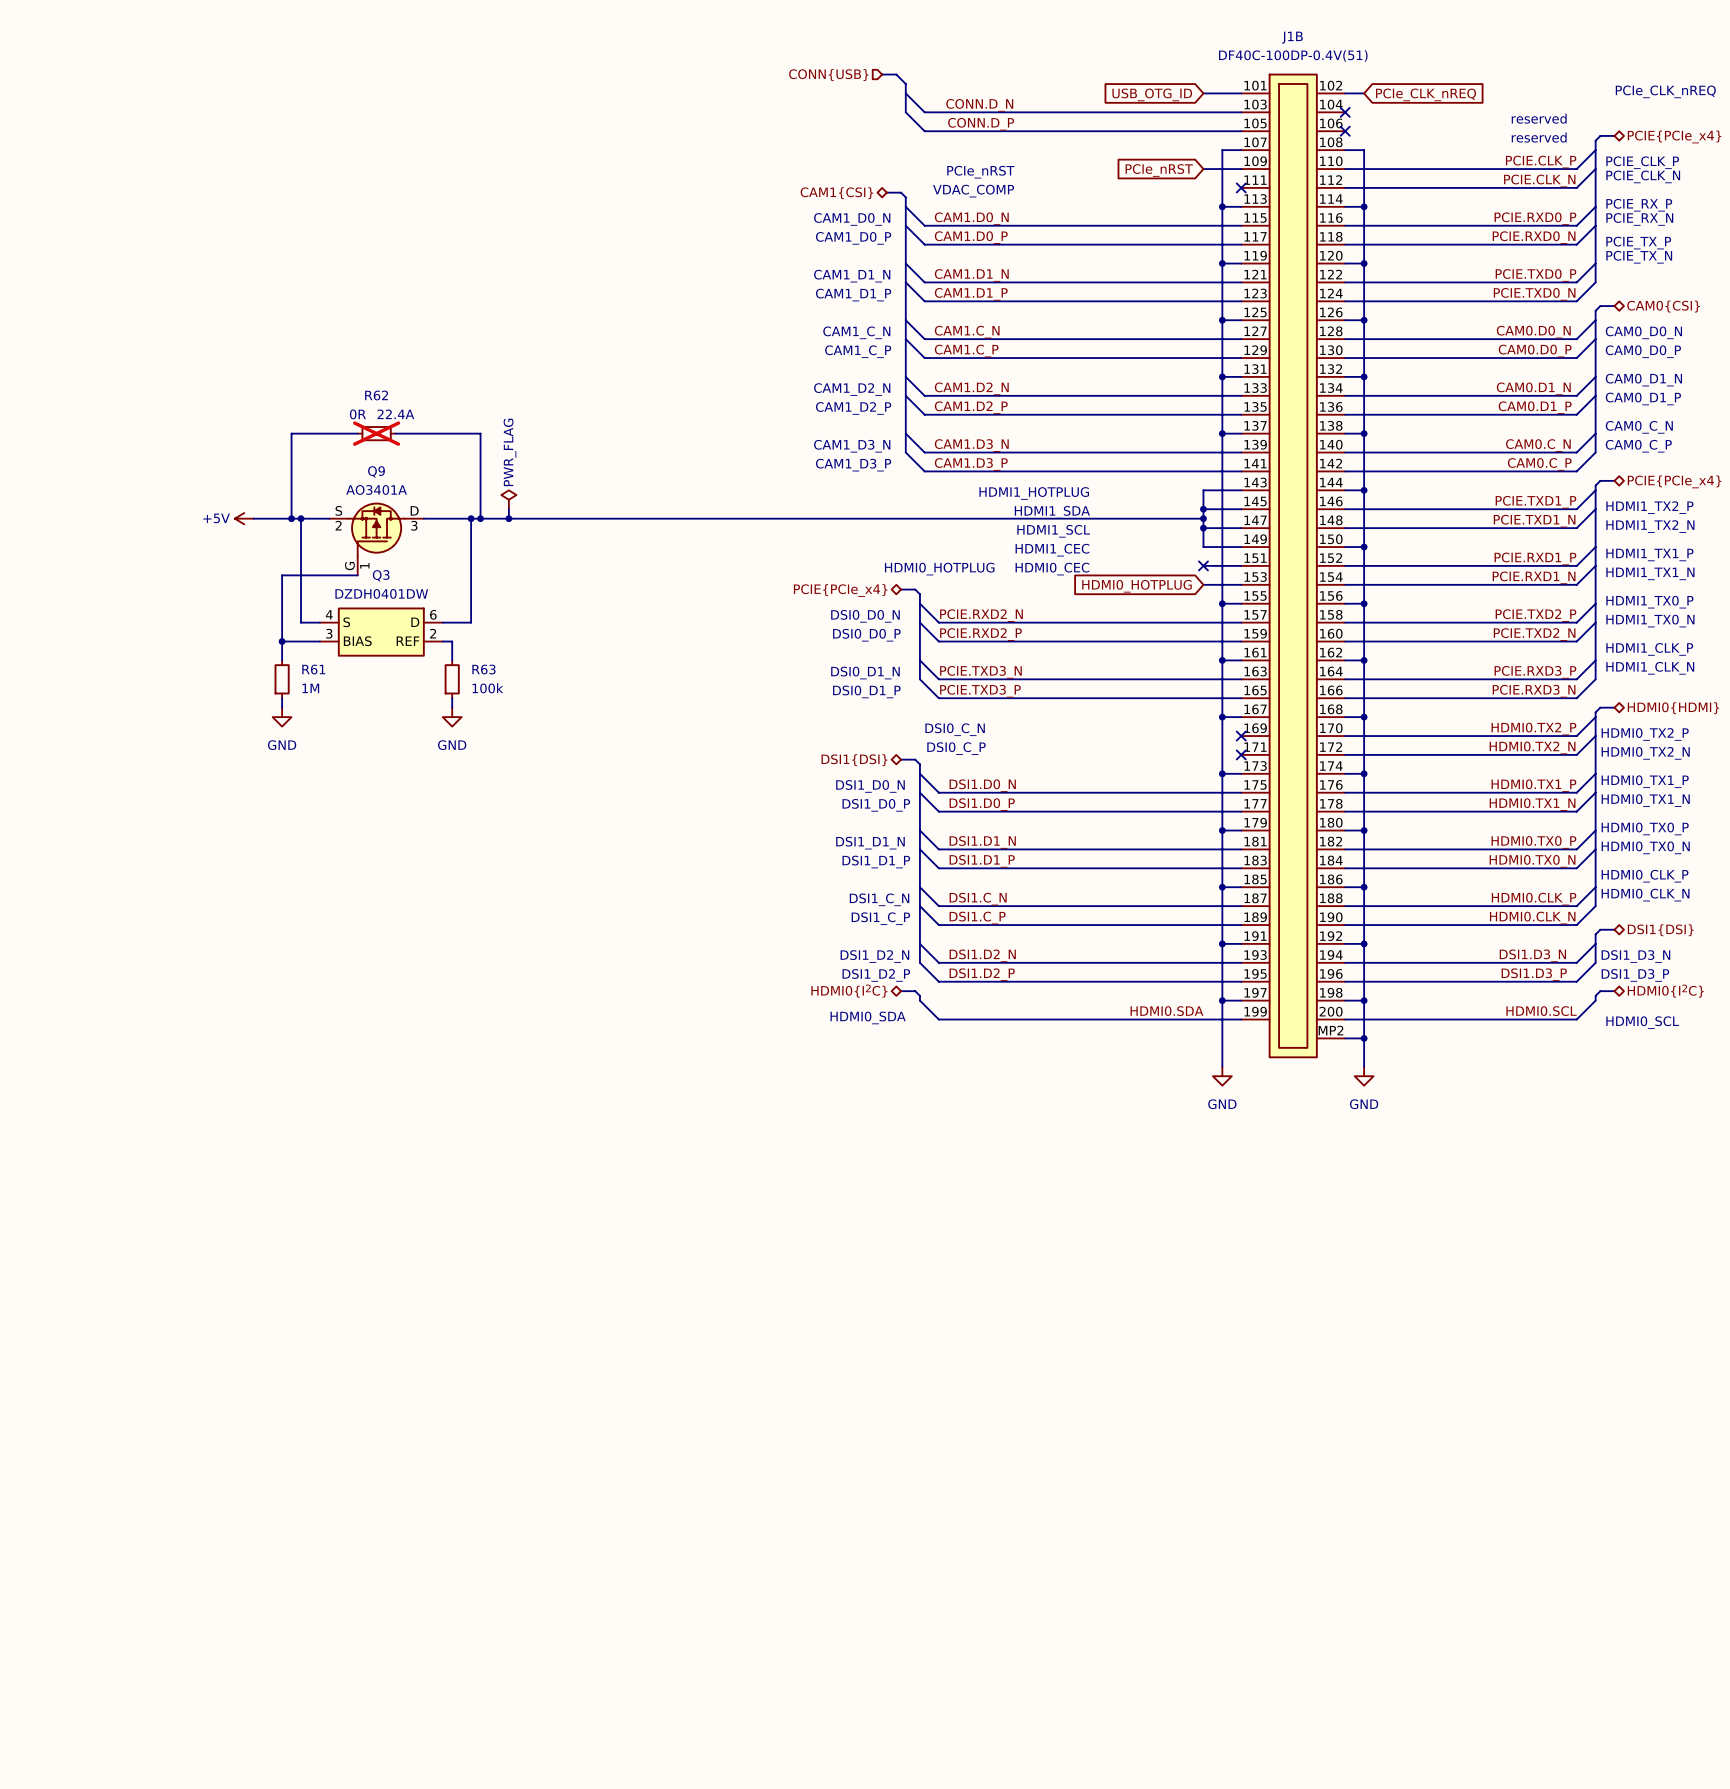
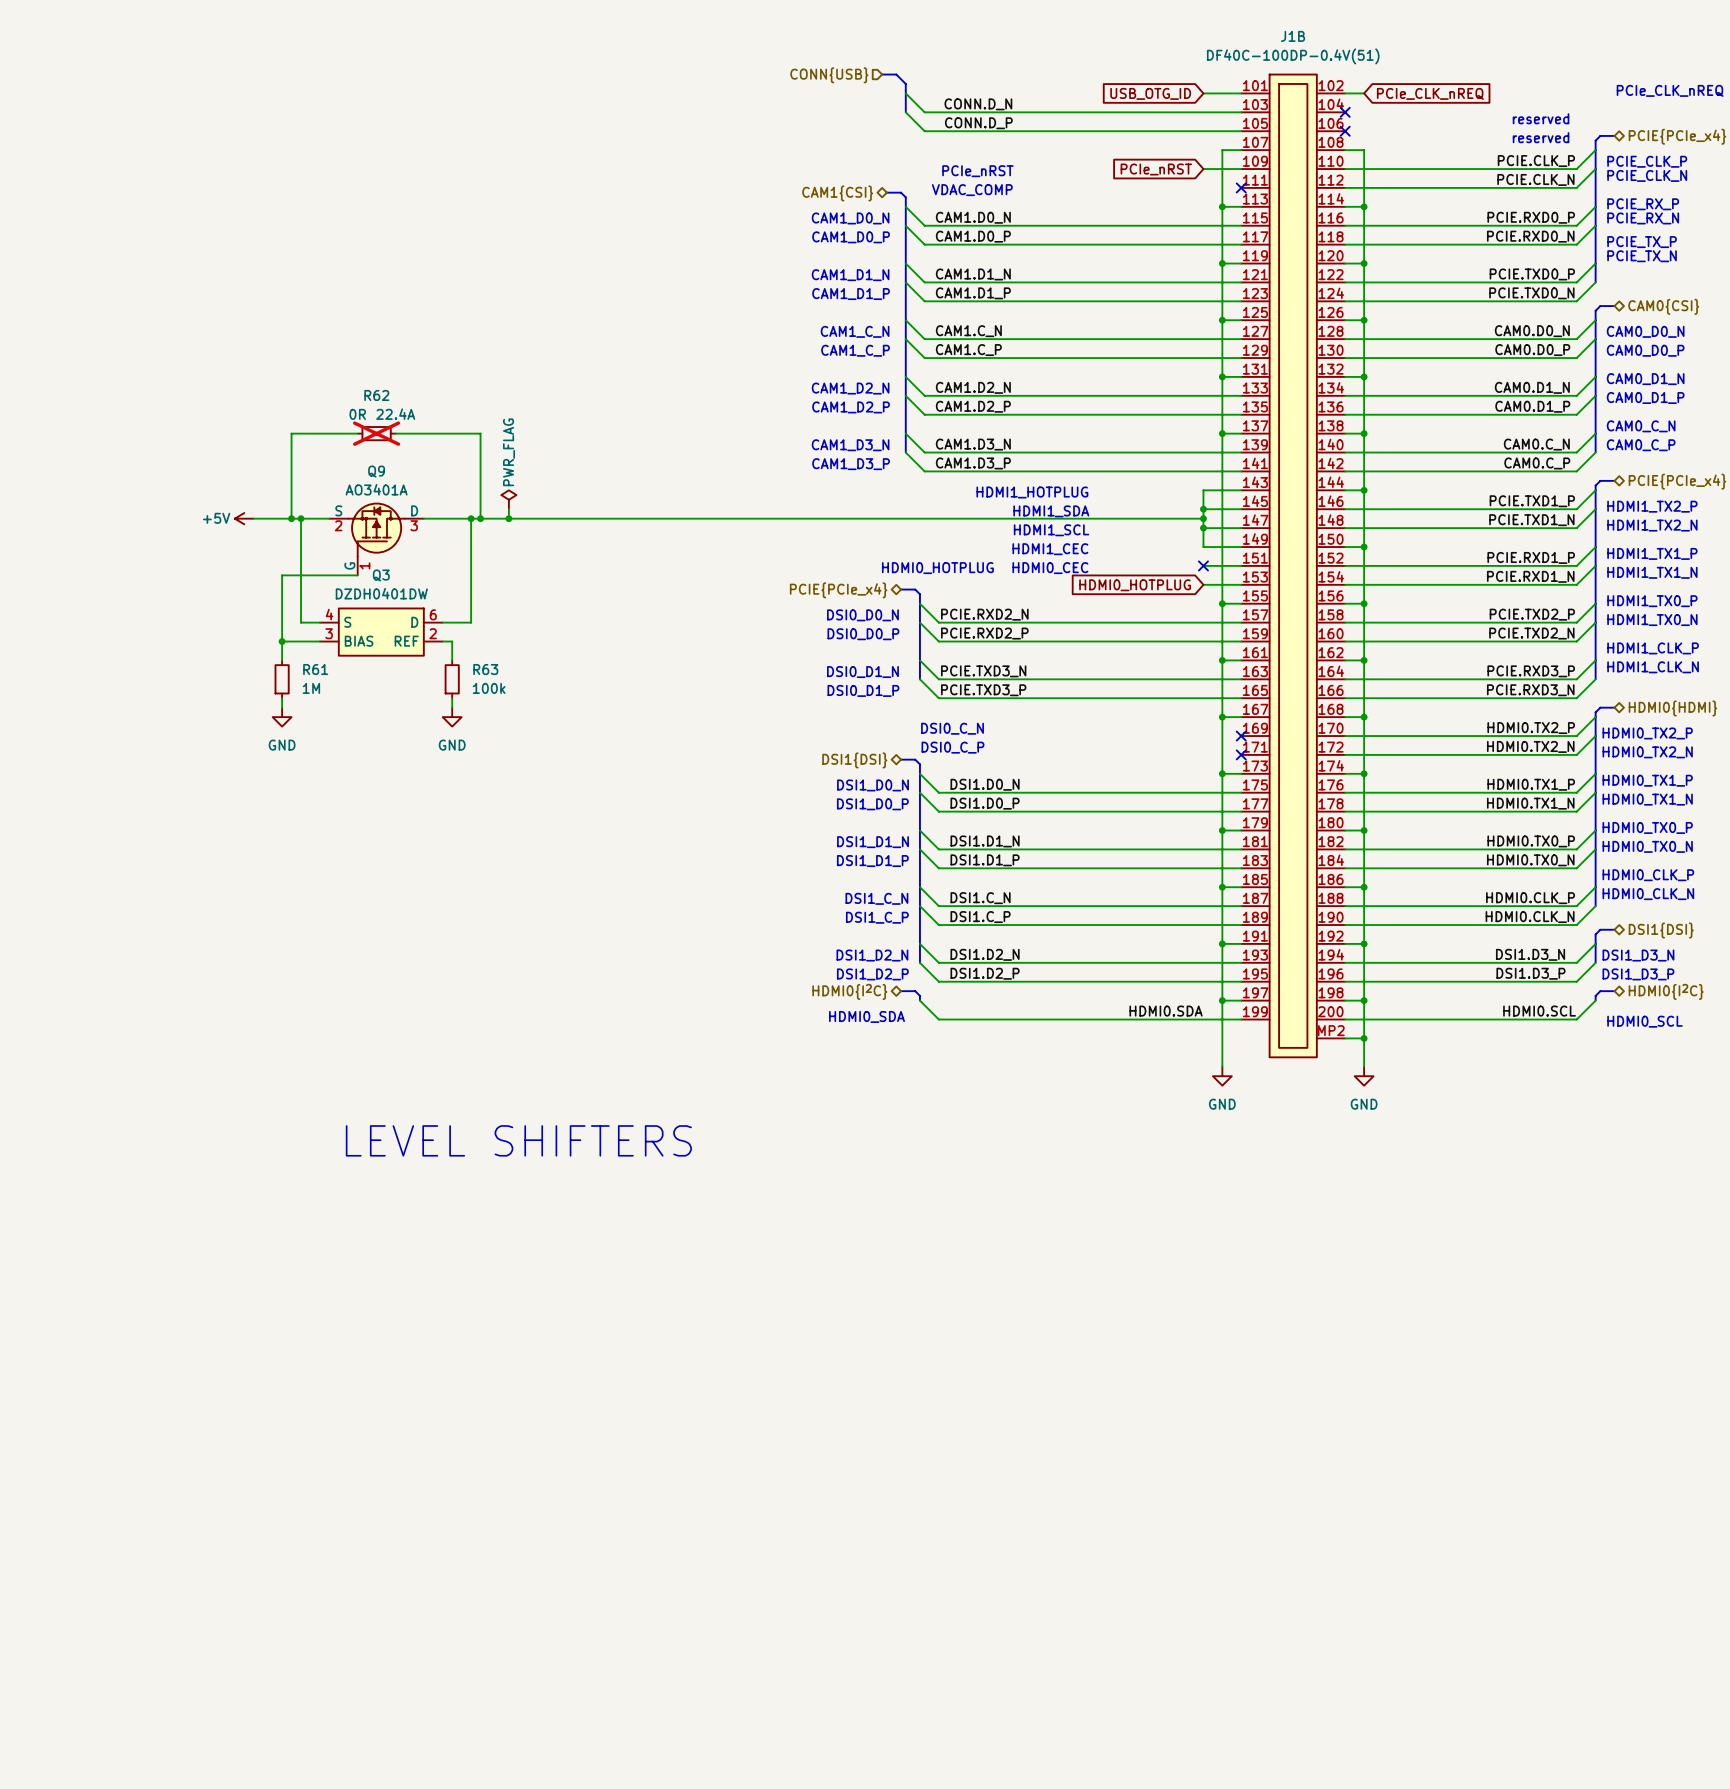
text: none -> LEVEL SHIFTERS (518, 1140)

